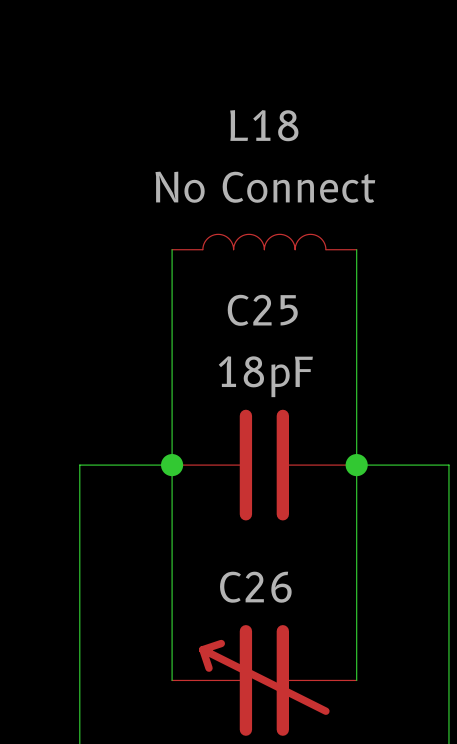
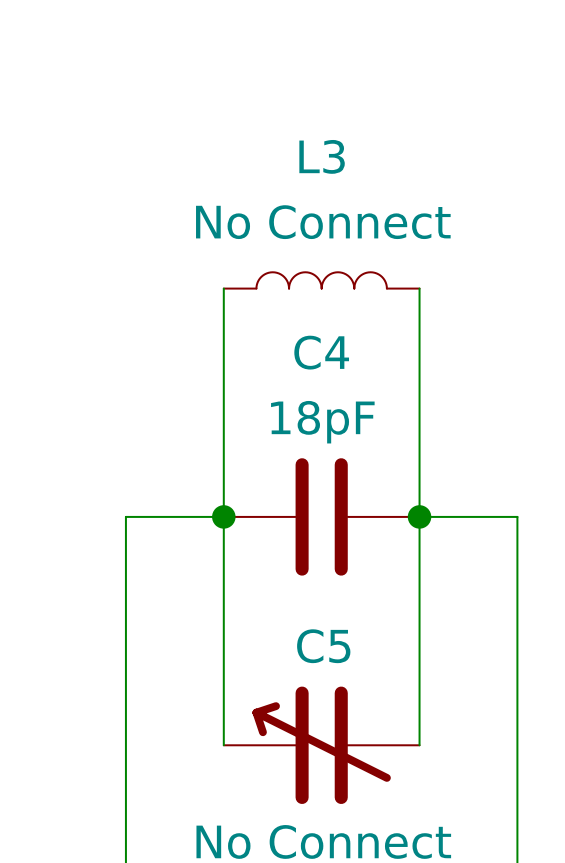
L18 name: L18 (264, 125) -> L3 (322, 156)
C25 name: C25 (262, 310) -> C4 (321, 352)
C26 name: C26 (255, 587) -> C5 (323, 646)

